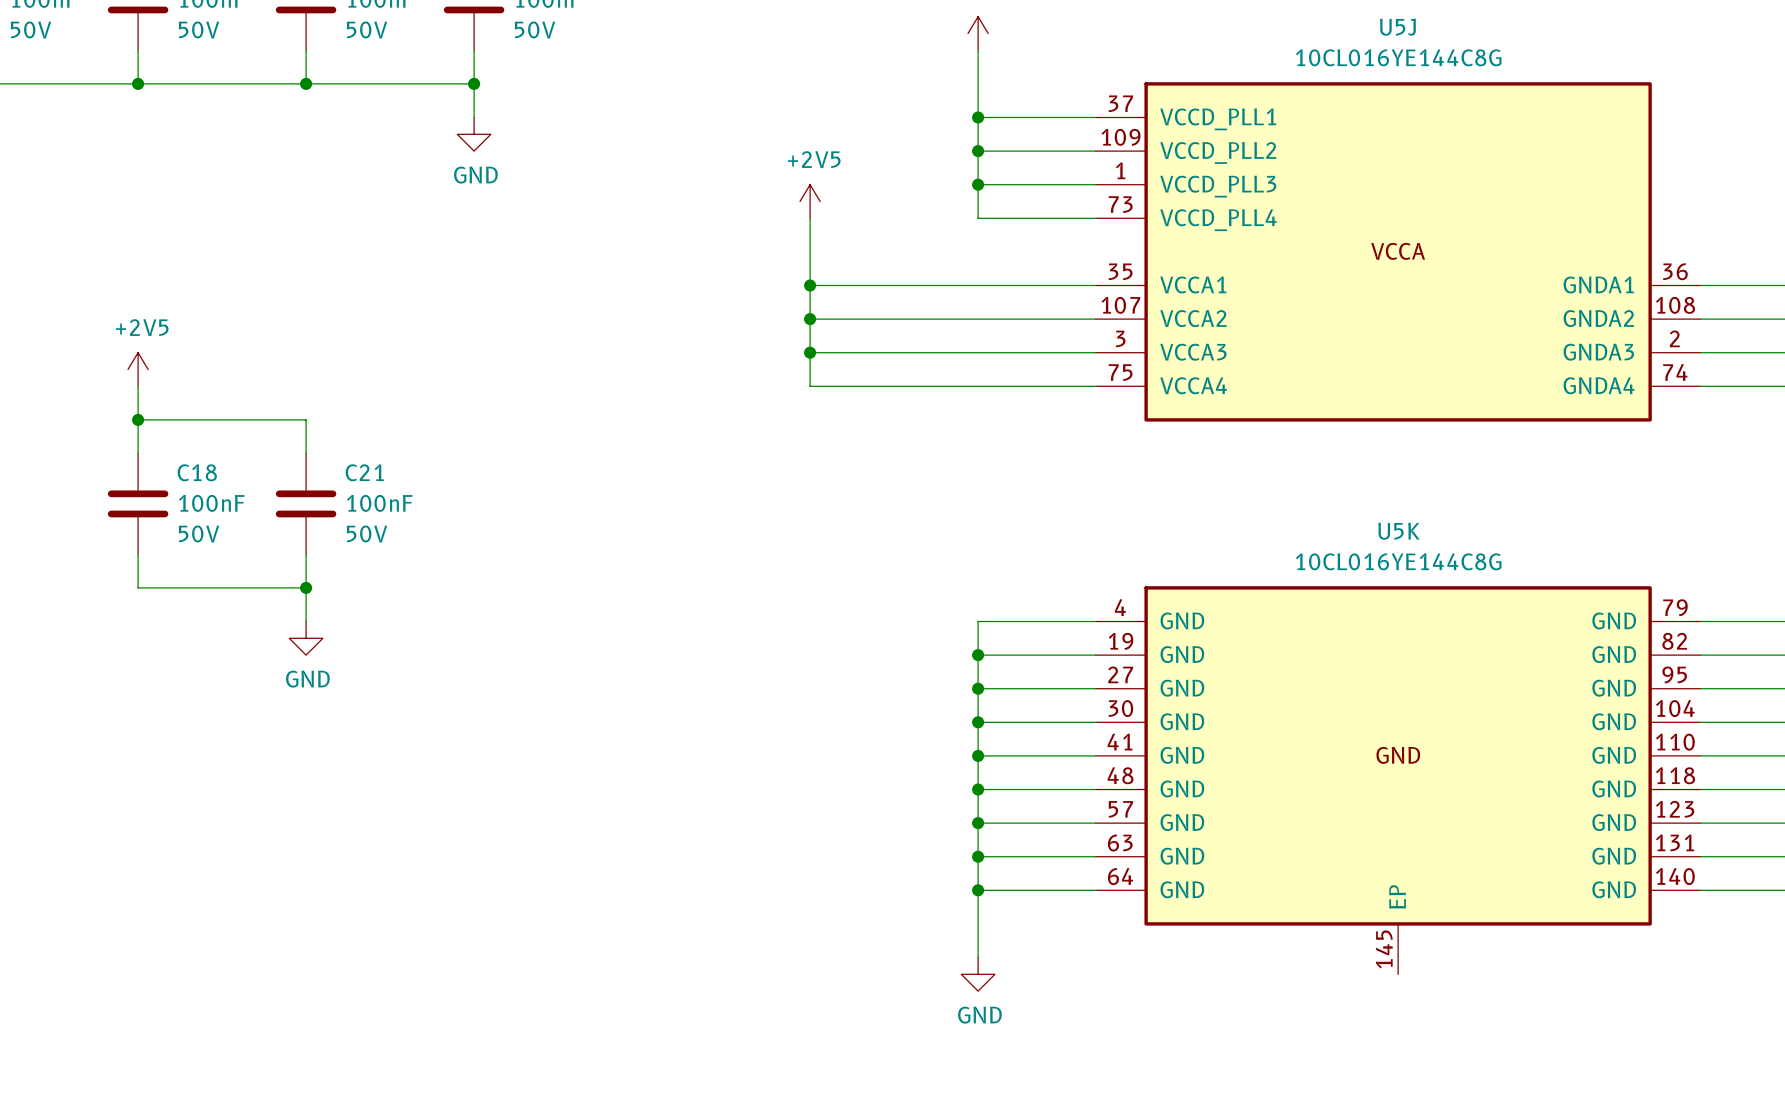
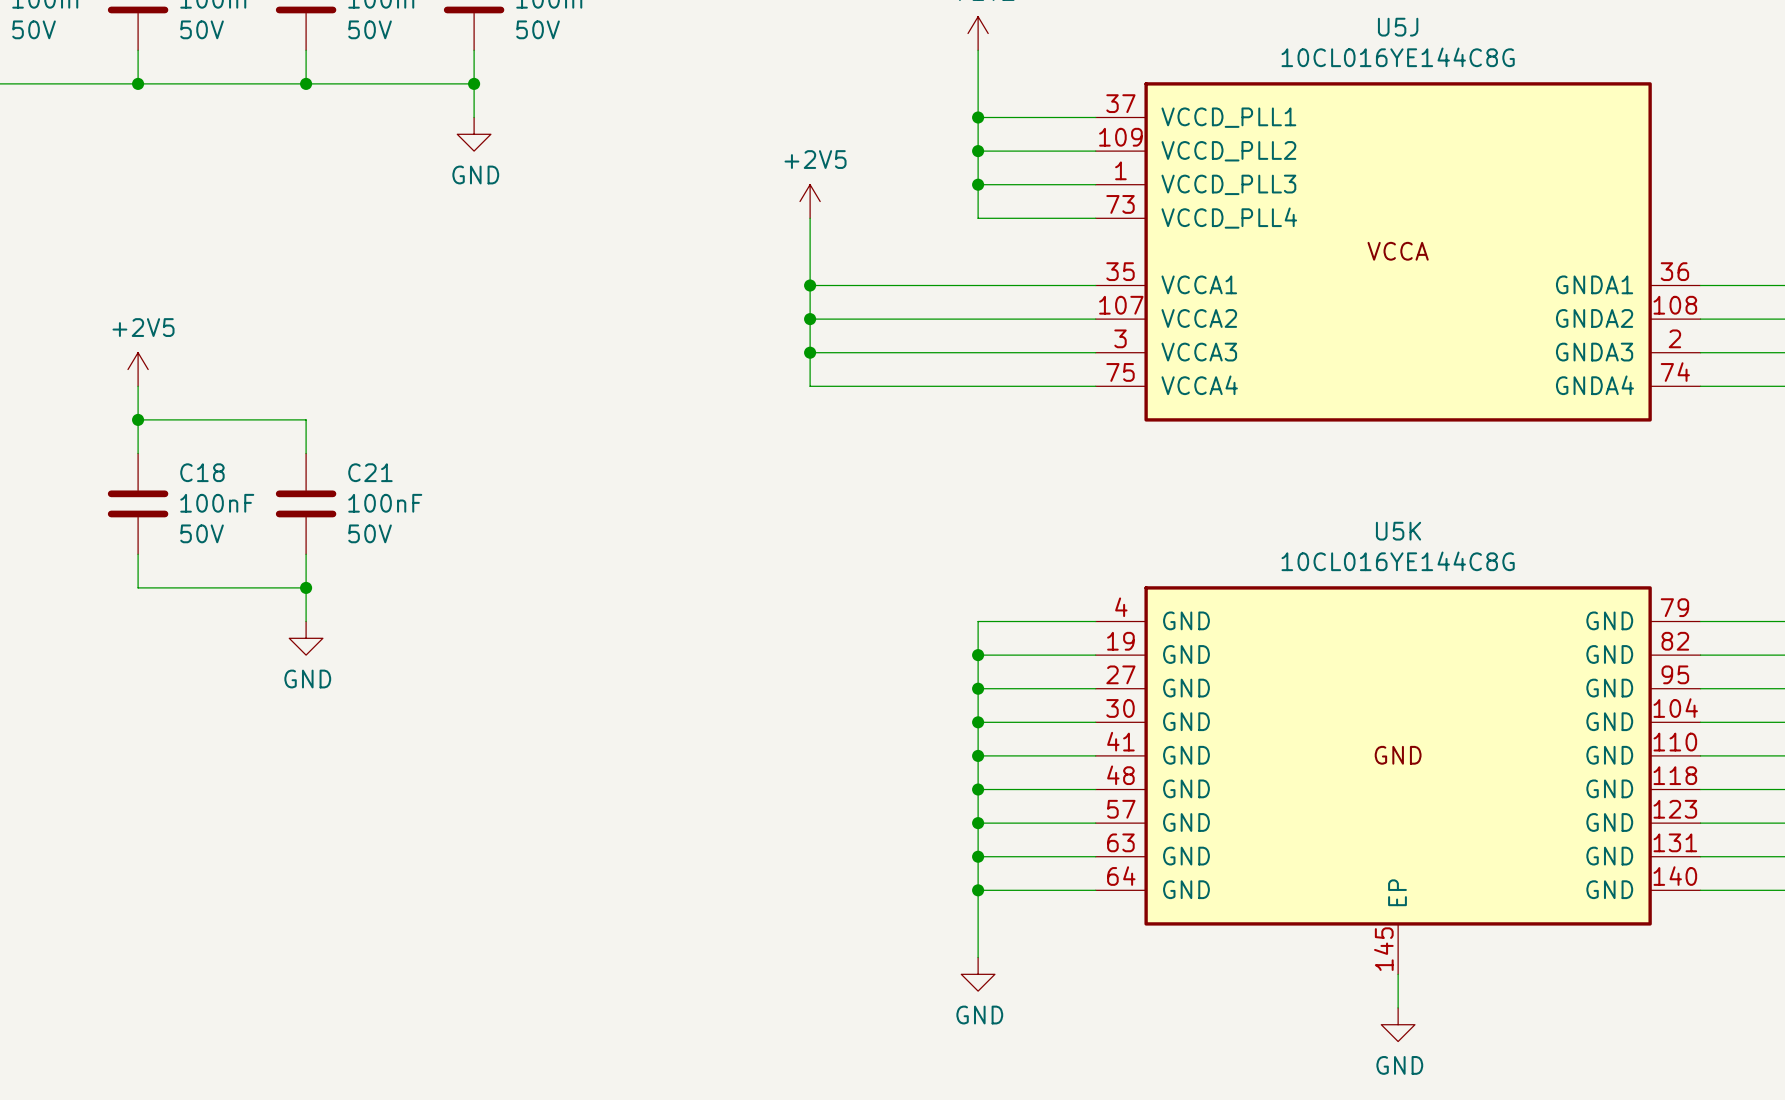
wire: none -> (1398, 974) (1398, 1007)
power symbol: none -> GND (1398, 1024)

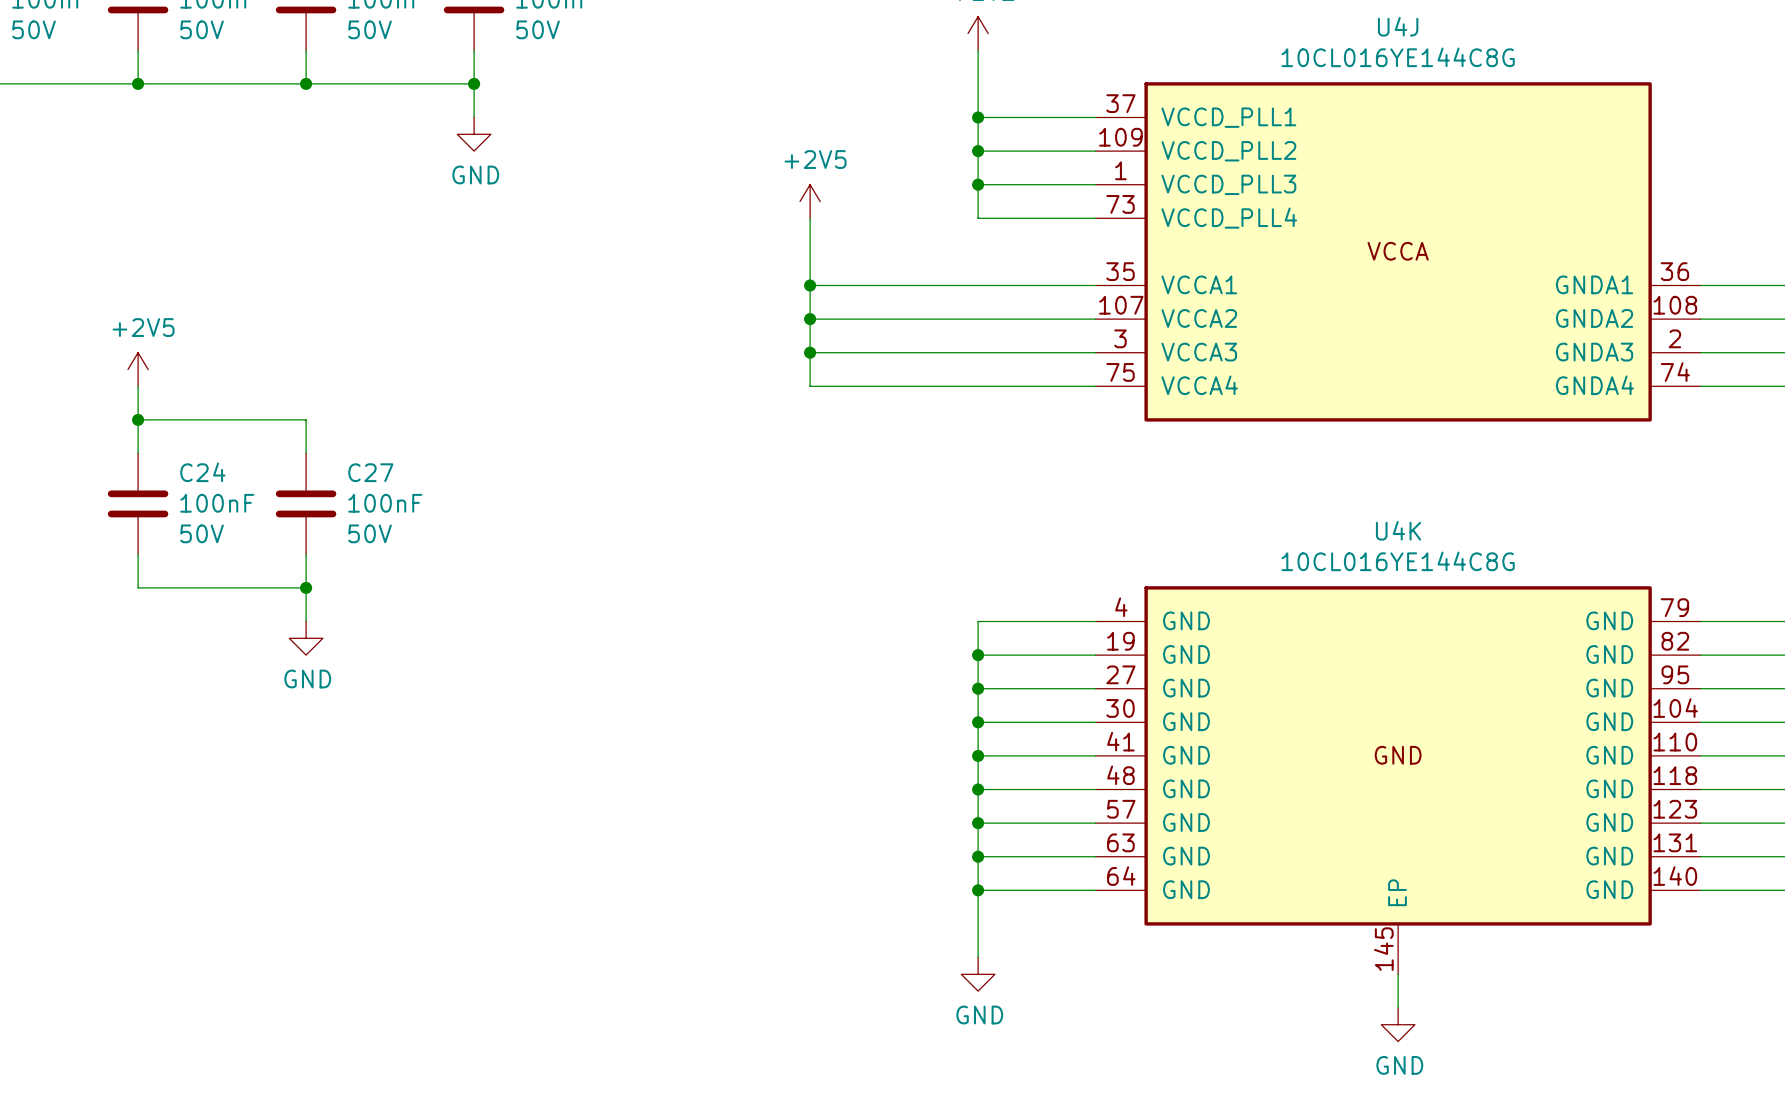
U5J name: U5J (1398, 27) -> U4J (1398, 26)
C18 name: C18 (202, 472) -> C24 (202, 472)
C21 name: C21 (370, 472) -> C27 (370, 472)
U5K name: U5K (1398, 531) -> U4K (1398, 530)

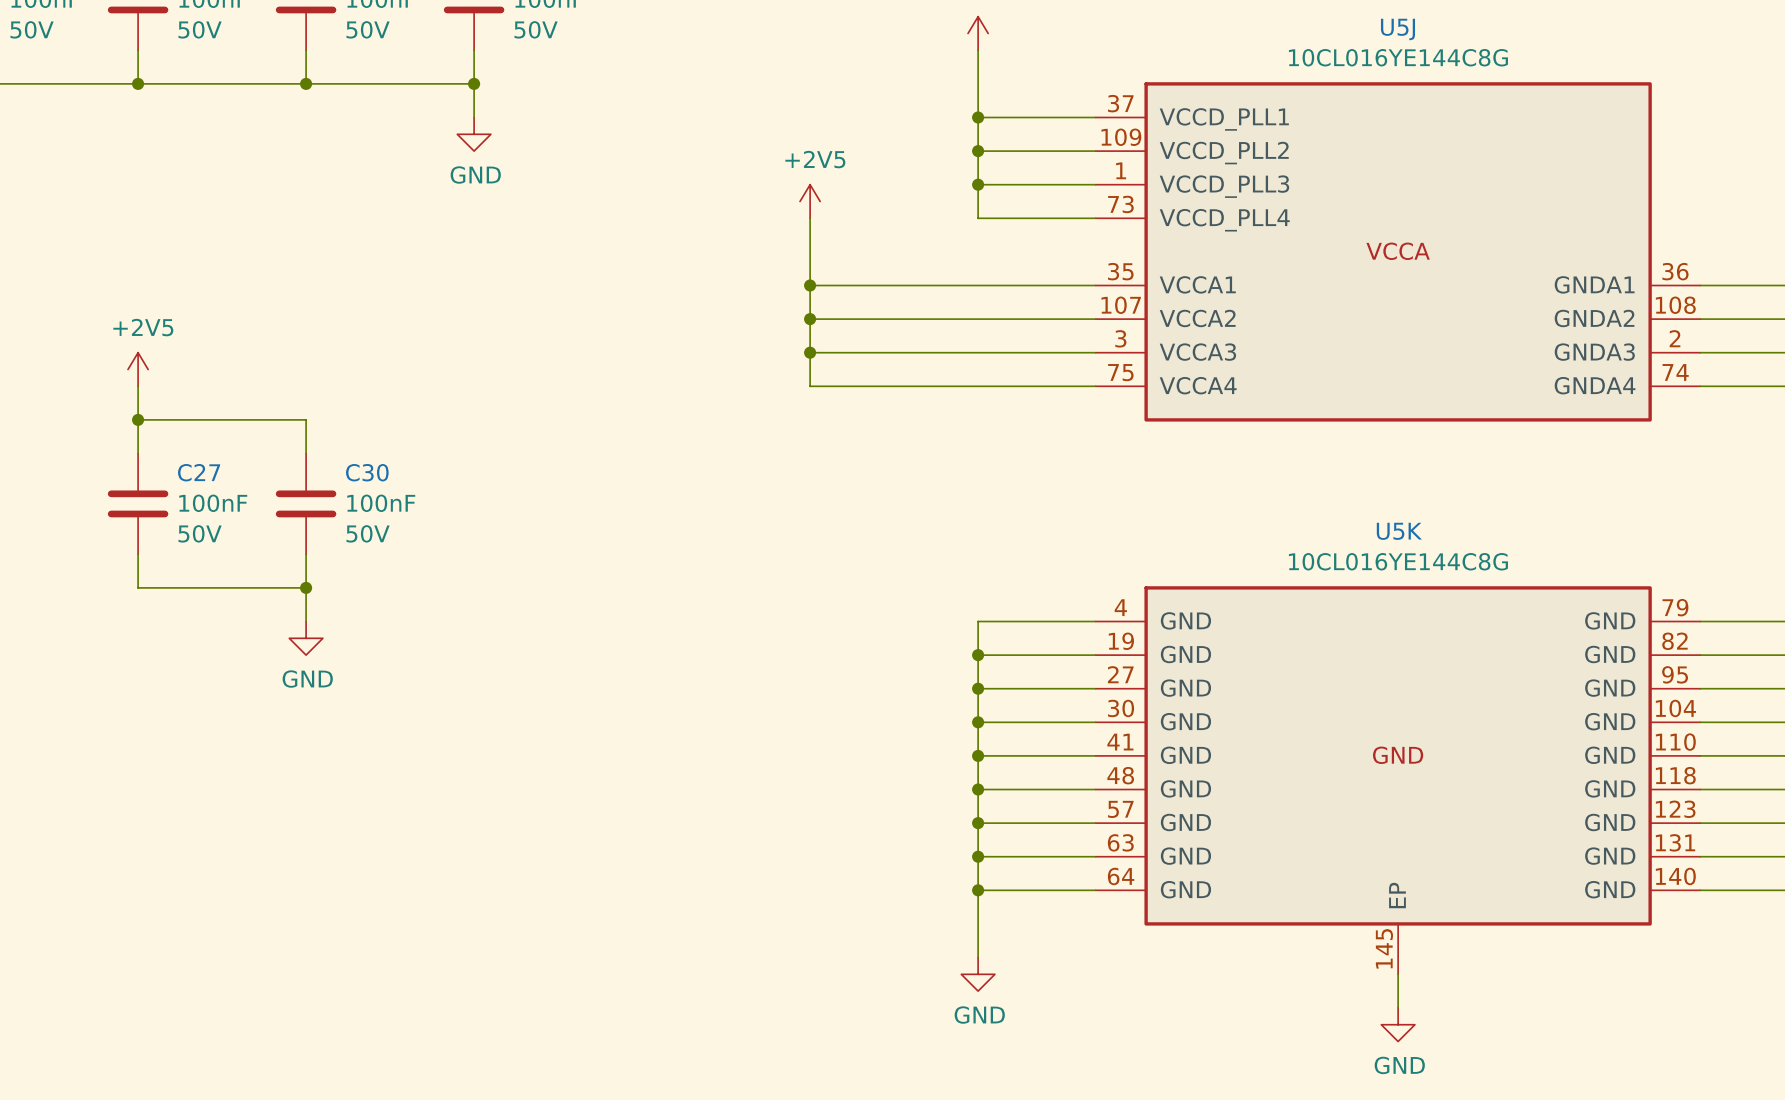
U4J name: U4J (1398, 26) -> U5J (1397, 29)
C24 name: C24 (202, 472) -> C27 (199, 472)
C27 name: C27 (370, 472) -> C30 (367, 472)
U4K name: U4K (1398, 530) -> U5K (1399, 531)

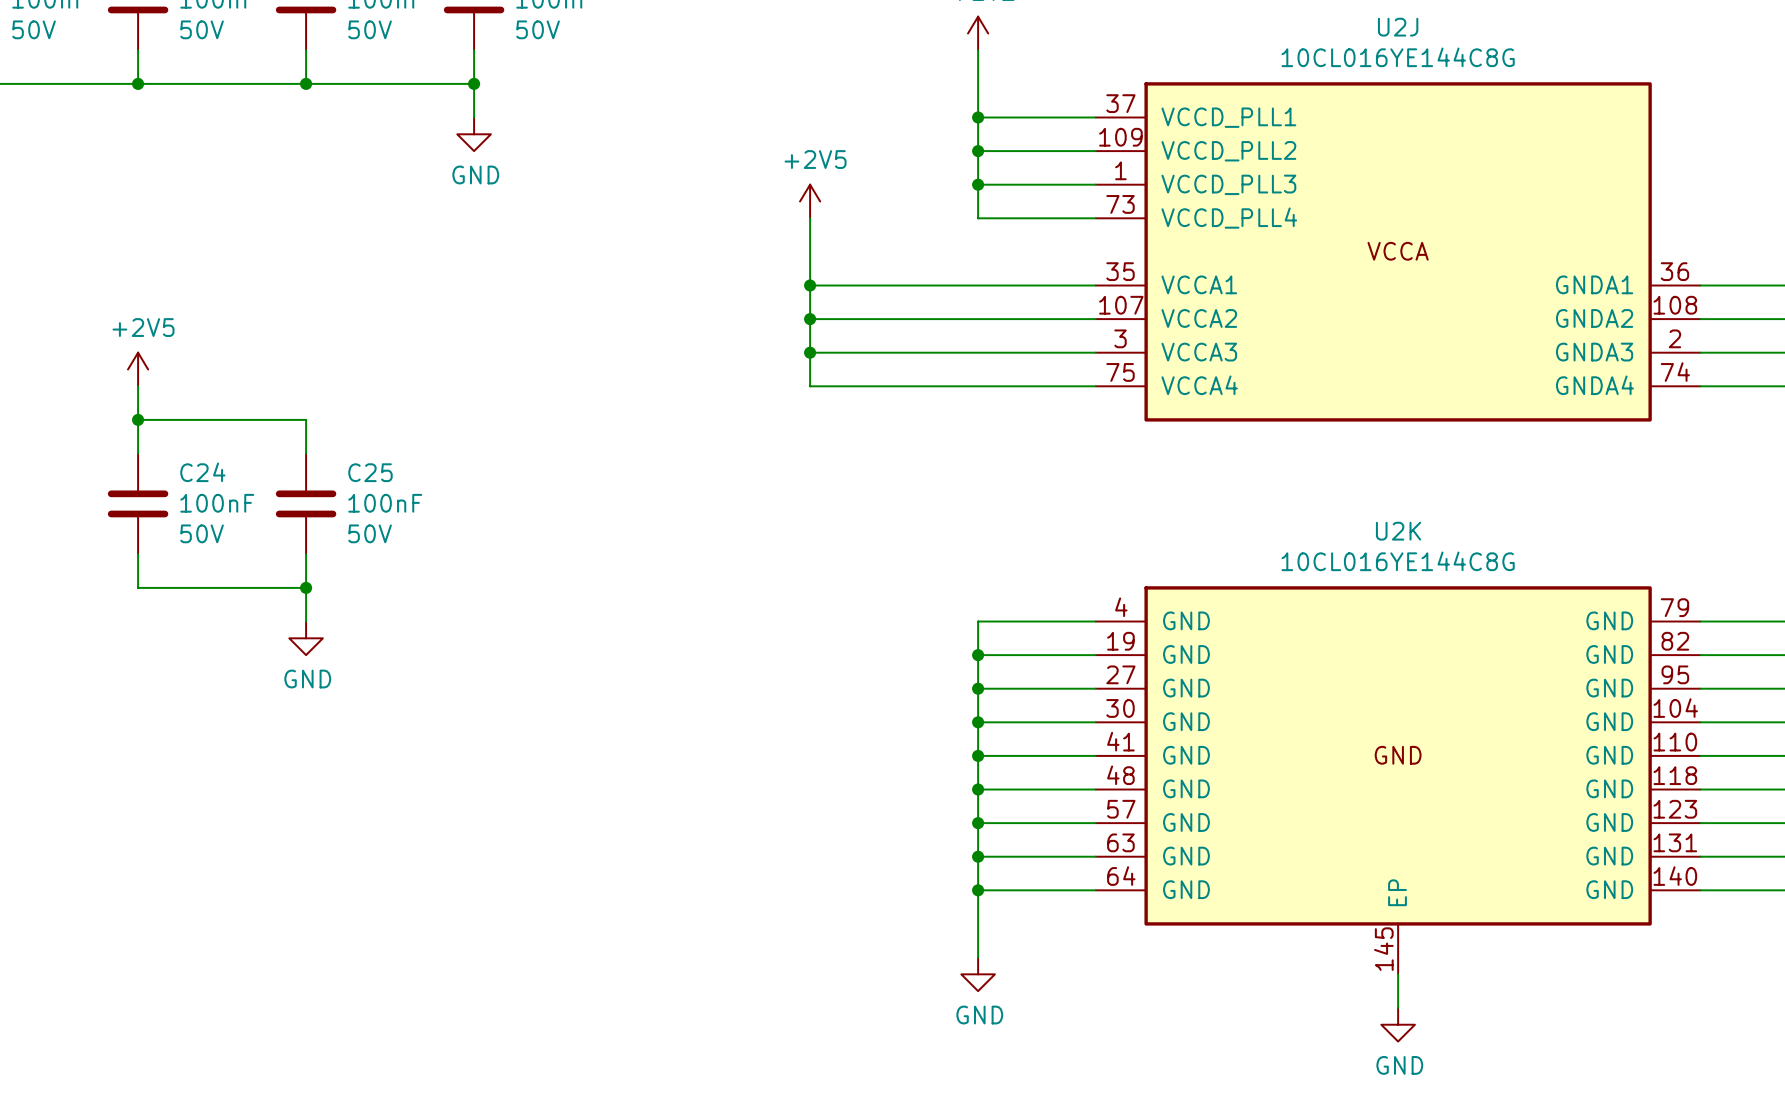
U5J name: U5J (1397, 29) -> U2J (1398, 27)
C27 name: C27 (199, 472) -> C24 (202, 472)
C30 name: C30 (367, 472) -> C25 (370, 472)
U5K name: U5K (1399, 531) -> U2K (1398, 531)

